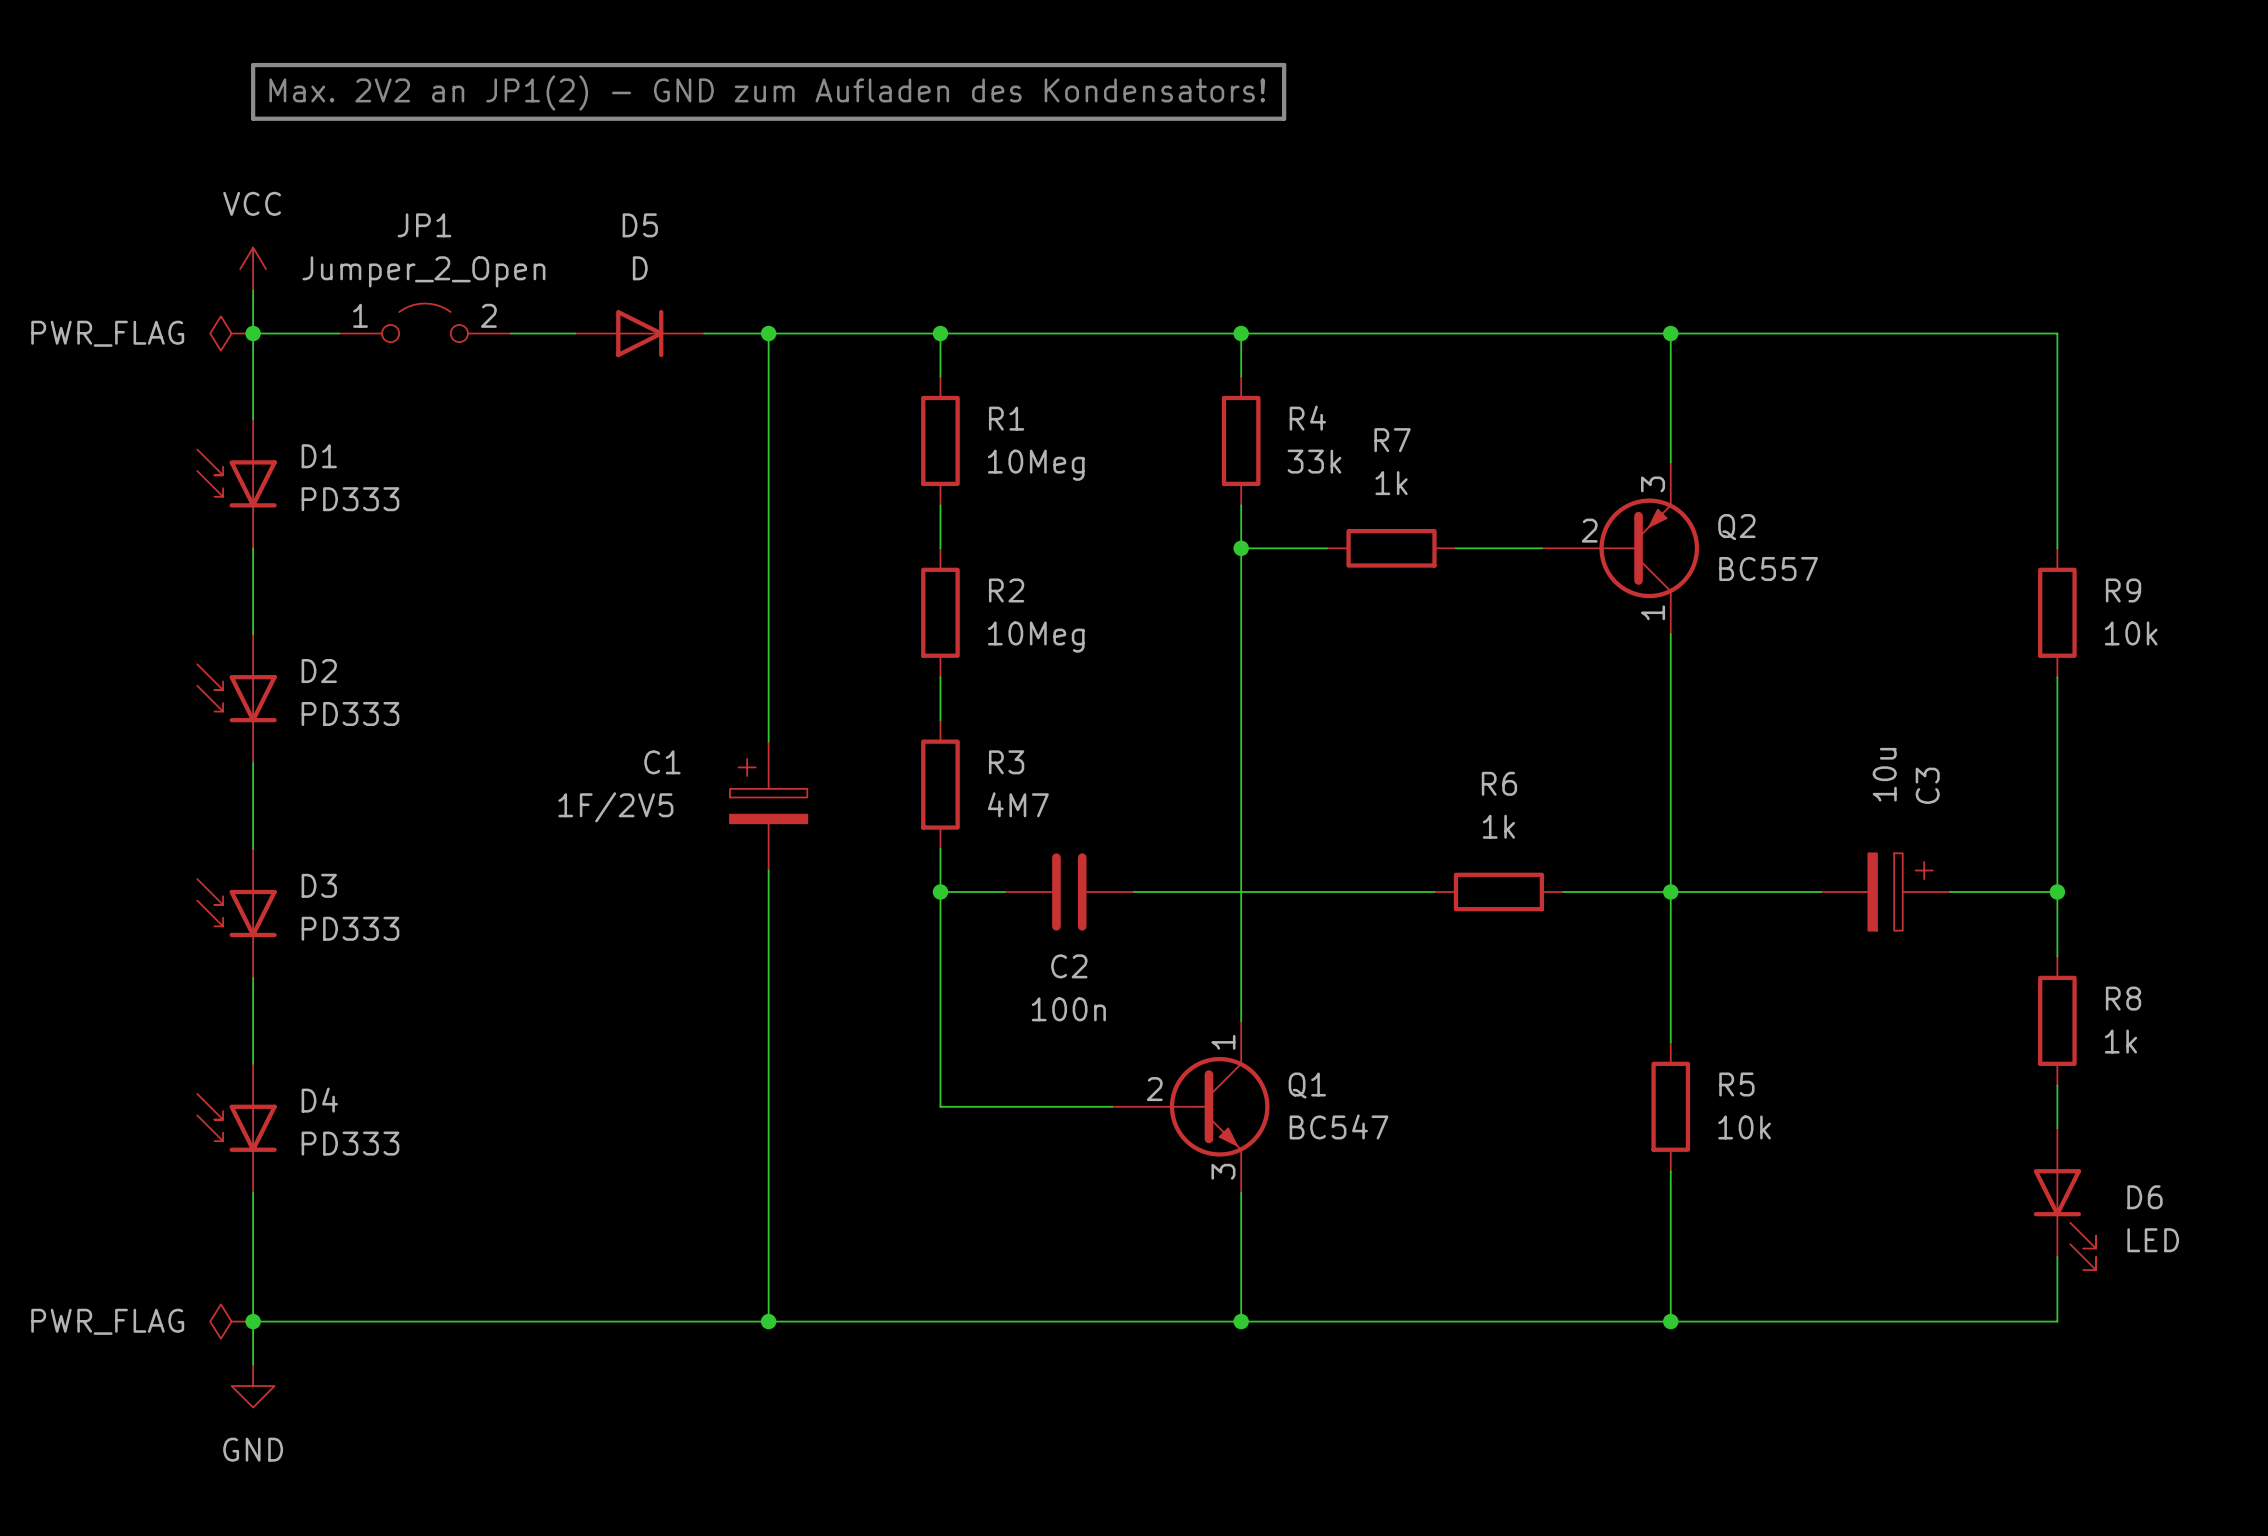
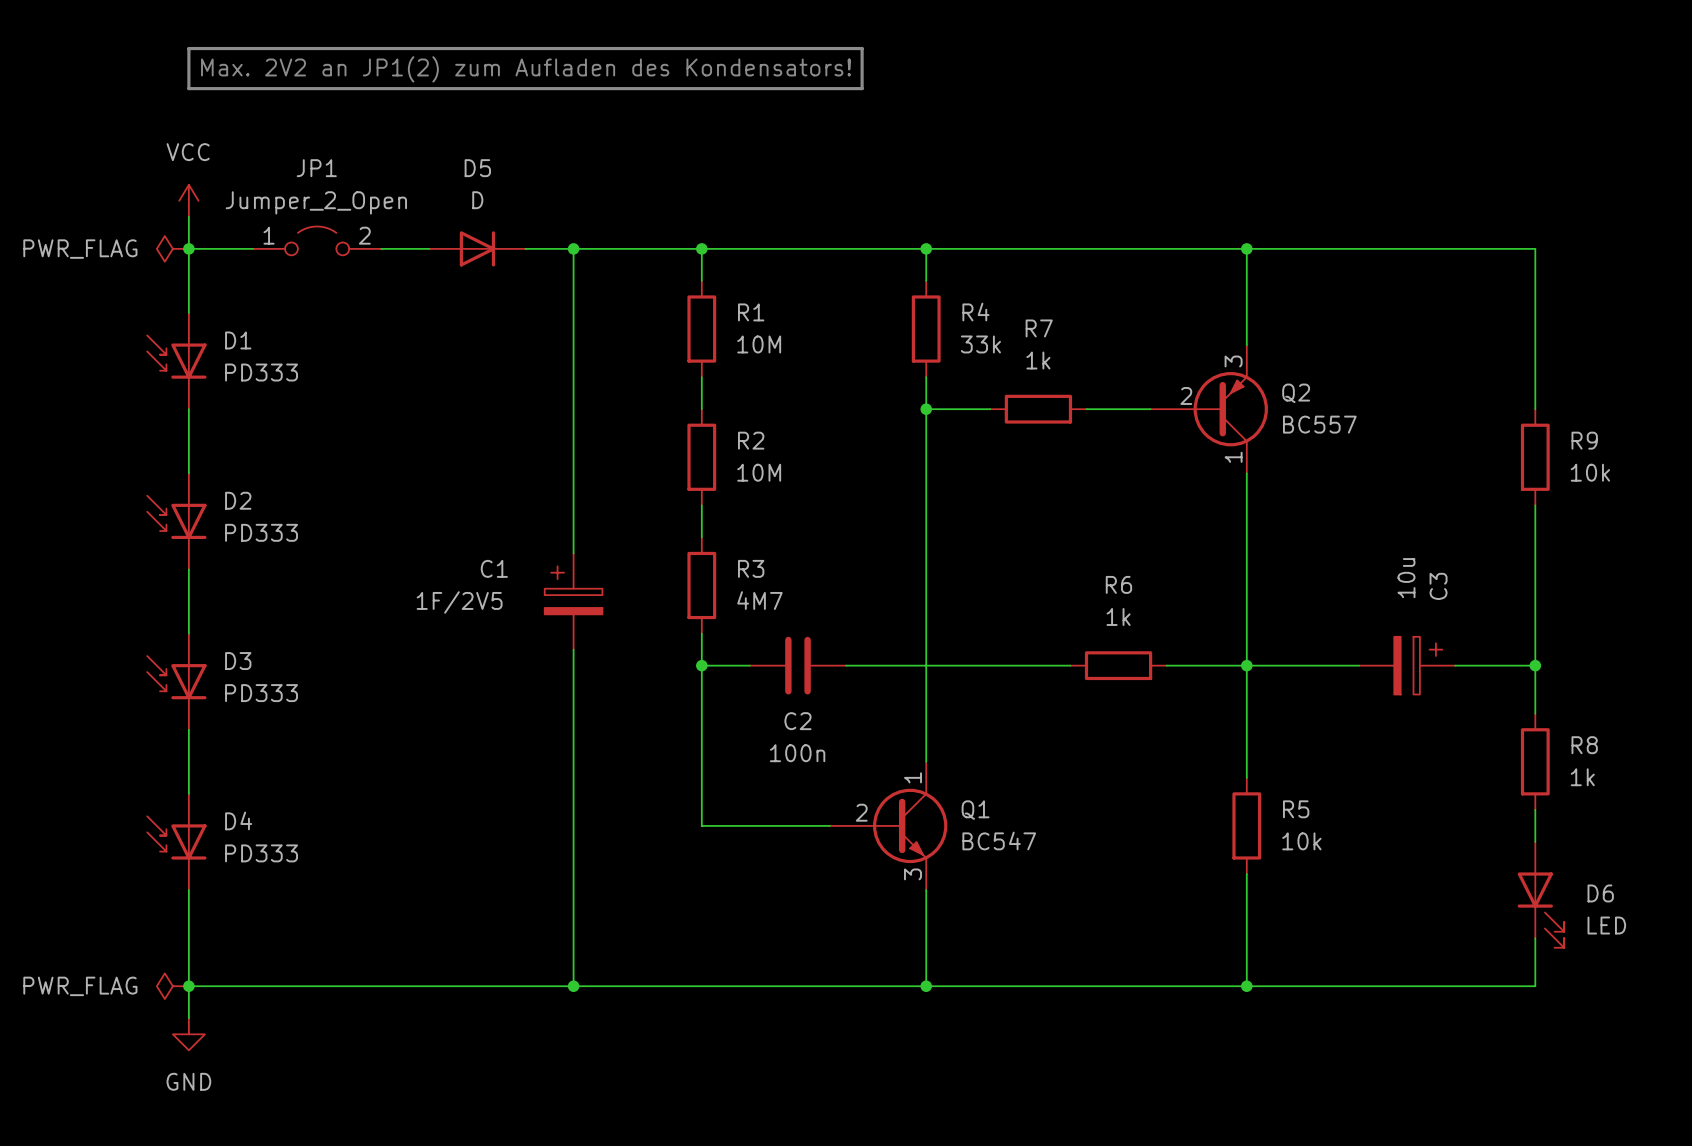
line: (1155, 65) (1284, 65) (1284, 118) (1155, 118) -> (862, 48) (862, 88)
text: Max. 2V2 an JP1(2) - GND zum Aufladen des Kondensators! (767, 92) -> Max. 2V2 an JP1(2) zum Aufladen des Kondensators! (526, 69)
R1 value: 10Meg (1036, 465) -> 10M (759, 344)
R2 value: 10Meg (1036, 637) -> 10M (759, 472)

